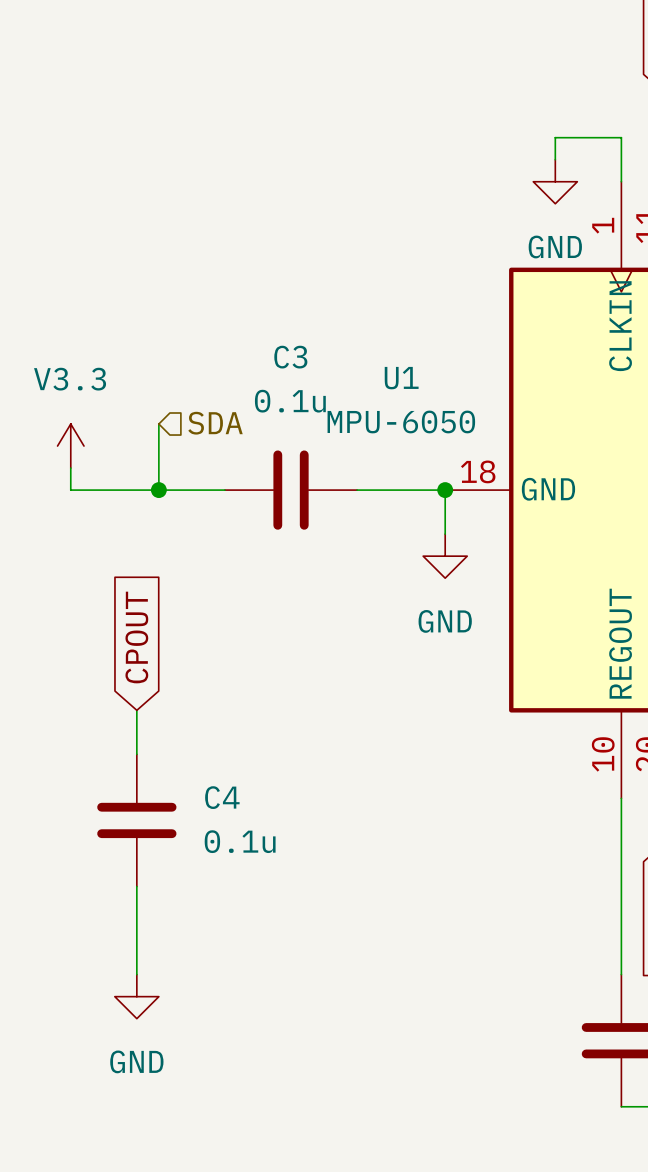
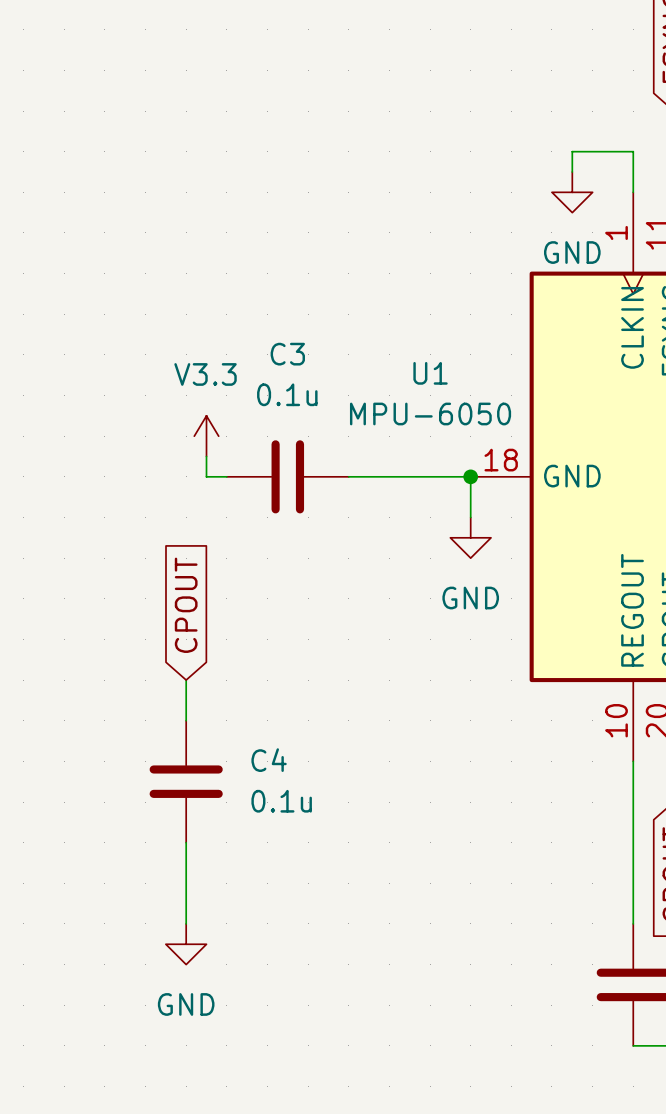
hierarchical label: SDA (215, 423) -> none
power symbol position: V3.3 (70, 446) -> V3.3 (206, 436)
wire: (70, 468) (70, 490) (158, 490) -> none
junction: (158, 490) -> none
C3 position: (291, 490) -> (287, 476)

